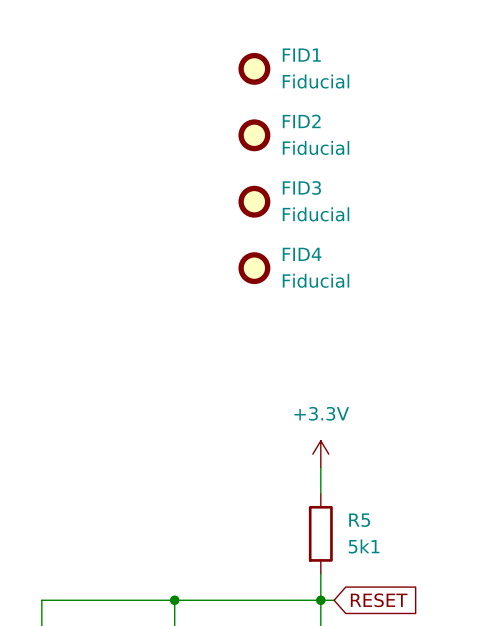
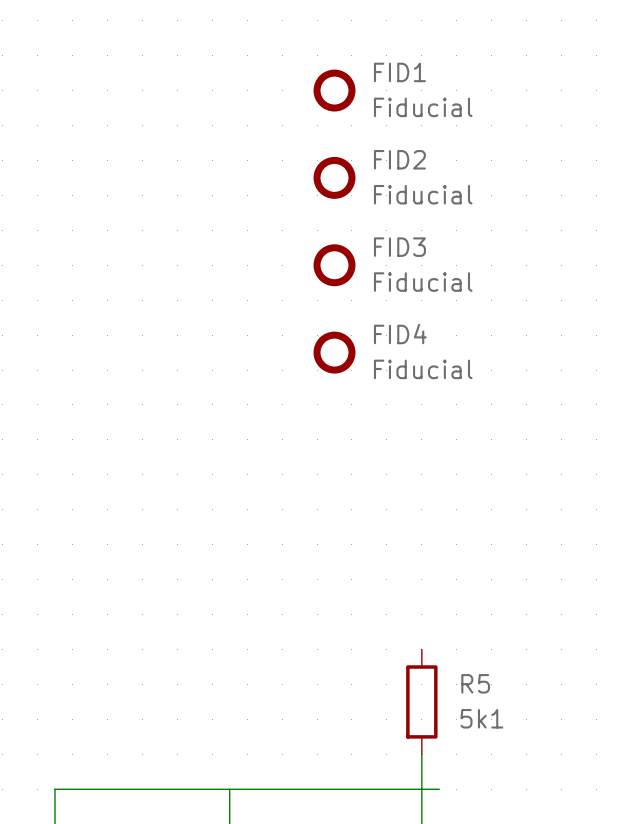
power symbol: +3.3V (320, 454) -> none
wire: (320, 467) (320, 494) -> none
junction: (174, 600) -> none
junction: (320, 600) -> none
global label: RESET (379, 600) -> none

